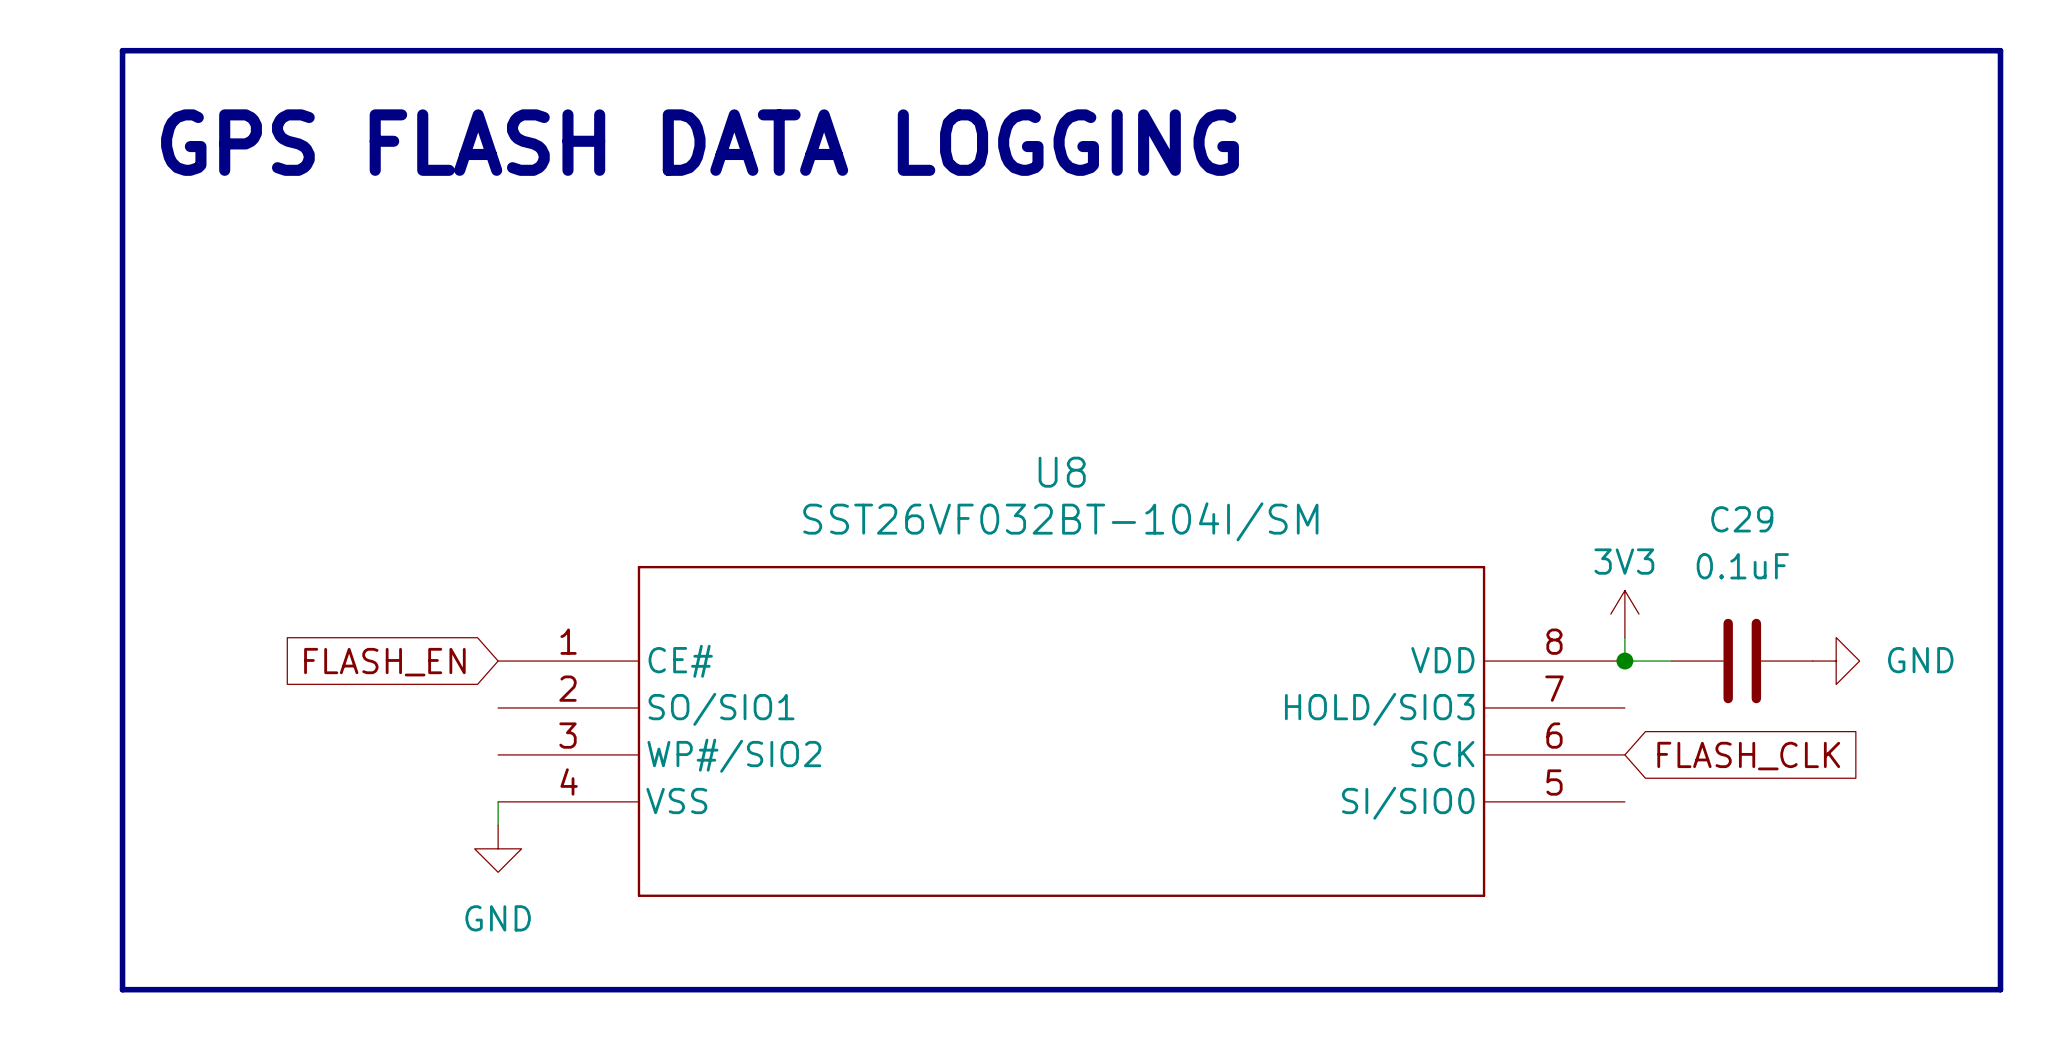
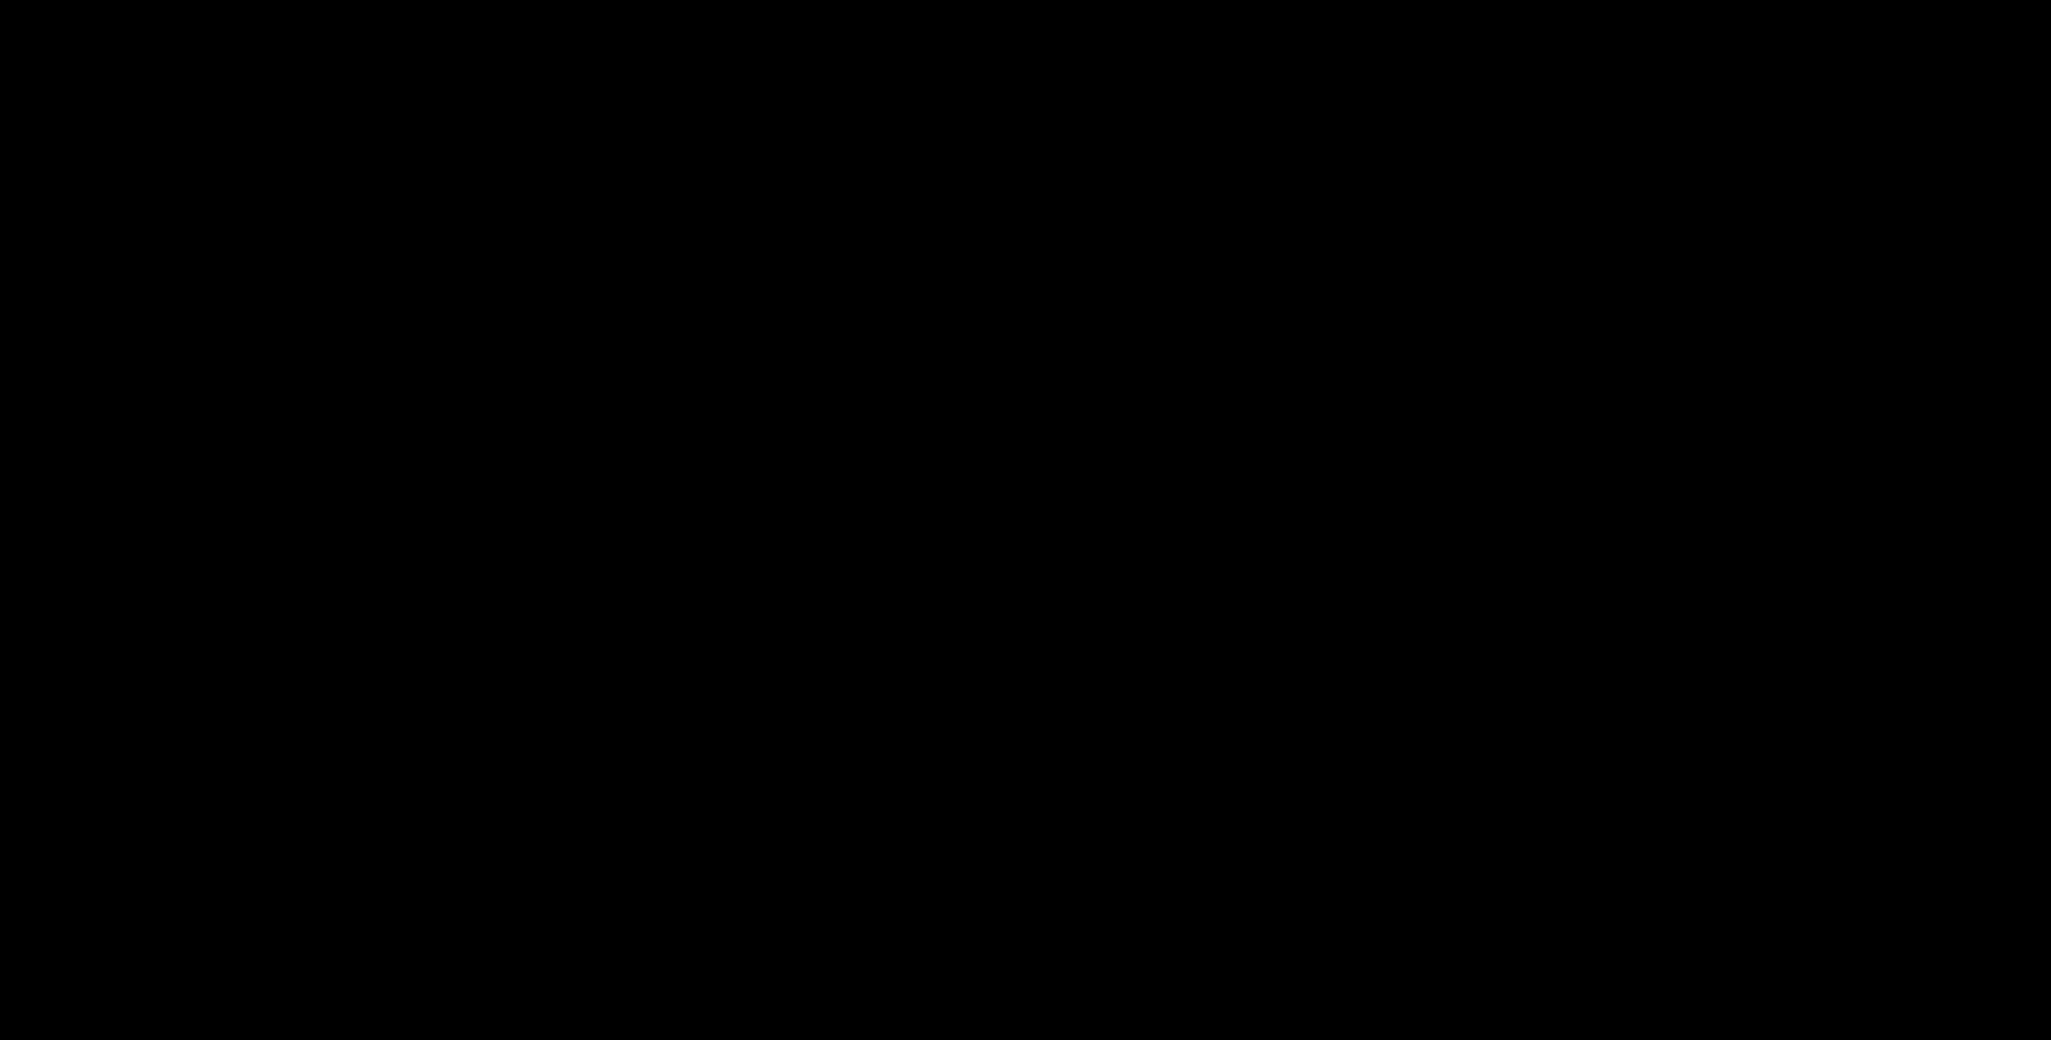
line: (122, 50) (2000, 50) (2000, 989) (122, 989) (122, 50) -> none
text: GPS FLASH DATA LOGGING (700, 142) -> none
power symbol: 3V3 (1624, 614) -> none
wire: (1624, 637) (1624, 661) (1671, 661) -> none
junction: (1624, 661) -> none
C29: 0.1uF (1742, 661) -> none
power symbol: GND (1836, 661) -> none
global label: FLASH_EN (384, 662) -> none
U8: SST26VF032BT-104I/SM (1061, 731) -> none
global label: FLASH_CLK (1748, 756) -> none
wire: (498, 801) (498, 825) -> none
power symbol: GND (498, 848) -> none

